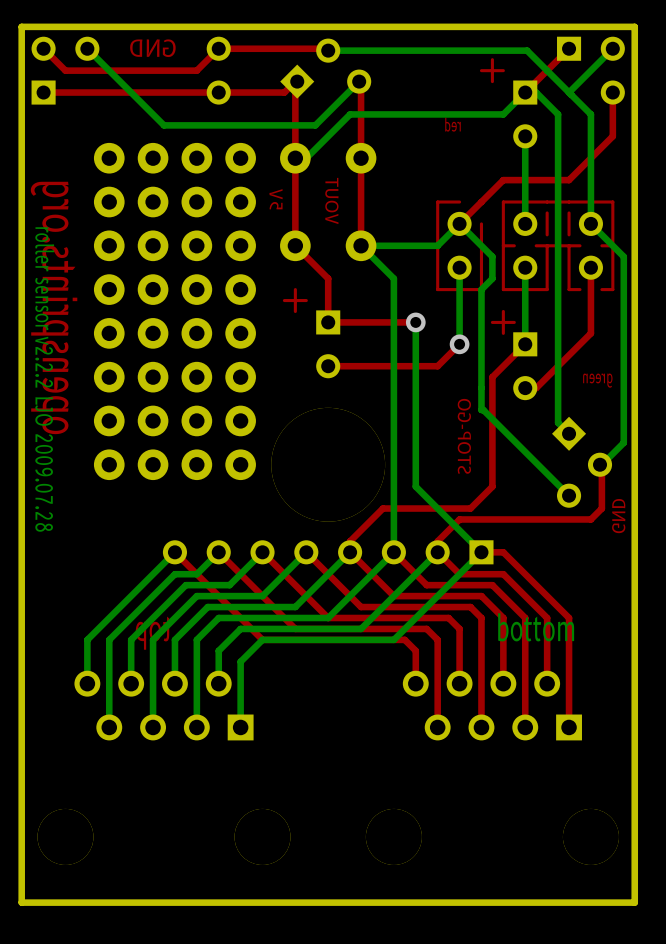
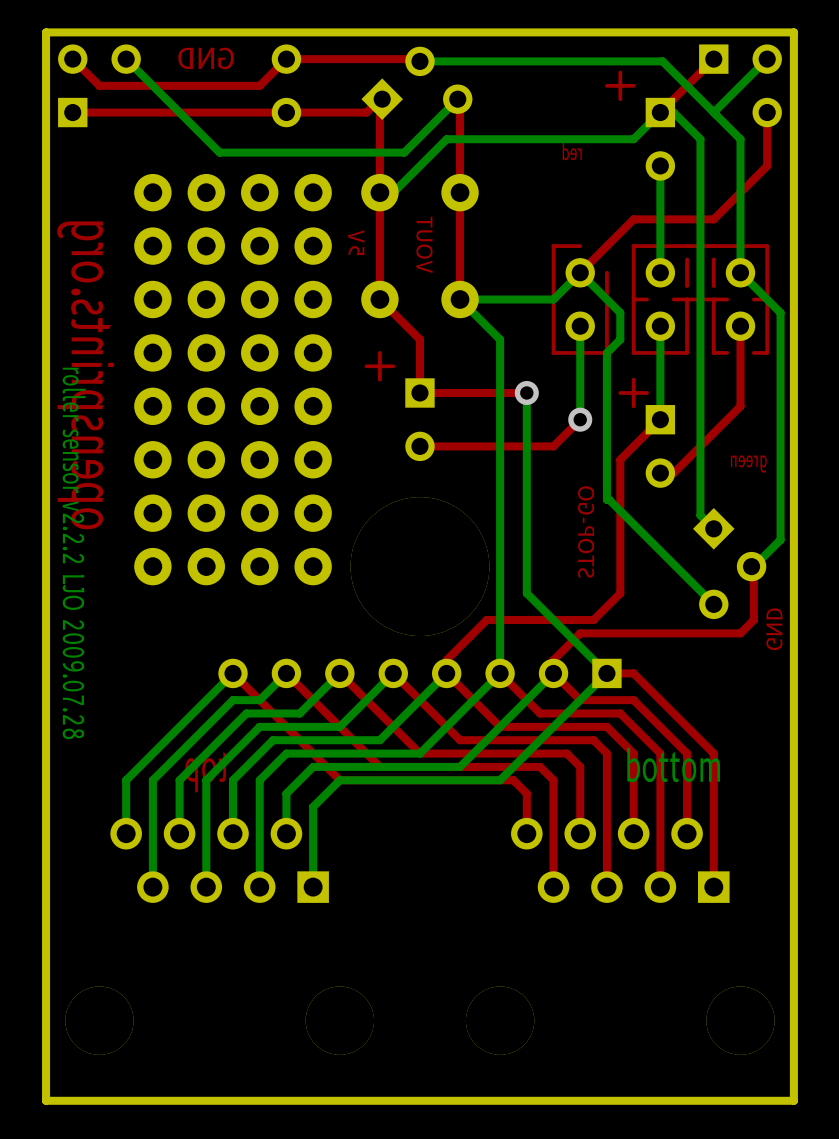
text position: roller sensor v2.2.2 LJO 2009.07.28 (44, 379) -> roller sensor v2.2.2 LJO 2009.07.28 (74, 553)

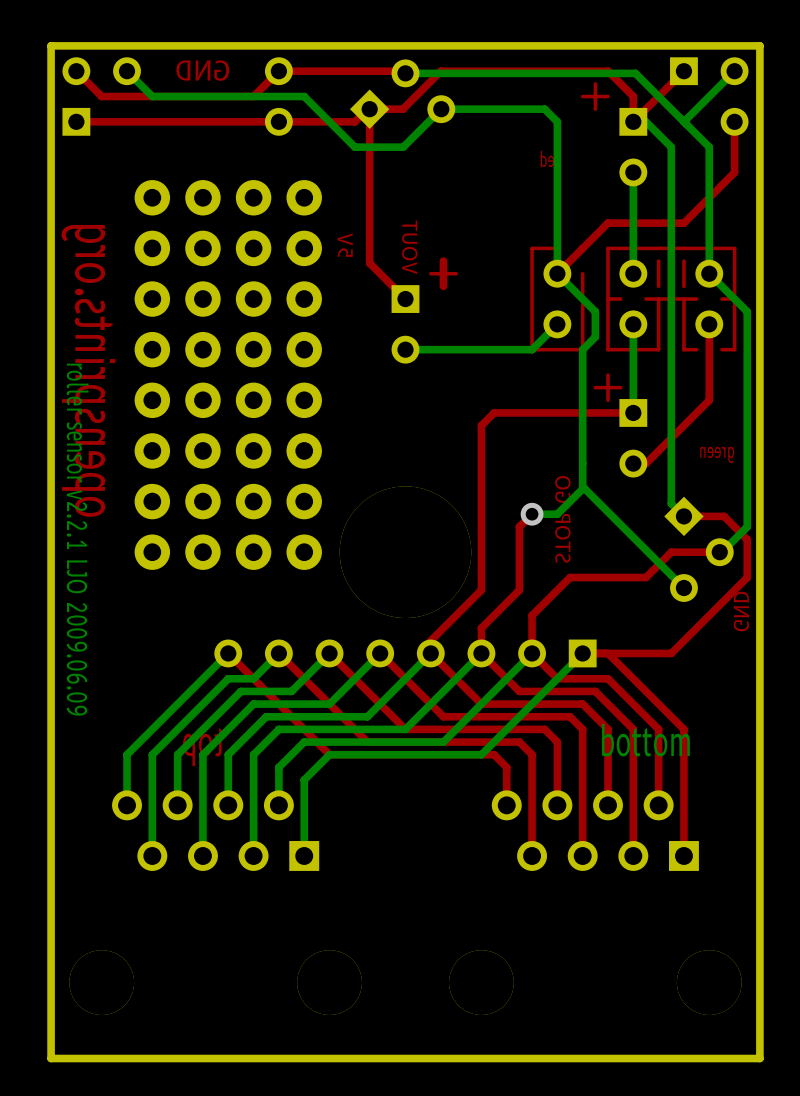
bottom track: (152, 85) (219, 152) (404, 152) (417, 139) -> (152, 96) (304, 96) (354, 147) (403, 147)
top track: (382, 99) (379, 101) (379, 299) (419, 339) (419, 392) (526, 392) -> (369, 109) (402, 109) (440, 71) (608, 71) (633, 96) (633, 121)
top track: (457, 99) (460, 101) (460, 259) -> none
top track: none -> (369, 111) (369, 263) (405, 299)
bottom track: (660, 112) (633, 139) (446, 139) (393, 192) (379, 192) -> none
part: (379, 192) -> none
part: (460, 192) -> none
bottom track: (580, 272) (553, 299) (460, 299) (500, 339) (500, 673) -> (557, 273) (557, 121) (544, 109) (441, 109)
part: (379, 299) -> none
part: (460, 299) -> none
bottom track: (580, 326) (580, 419) -> (557, 324) (532, 349) (405, 349)
top track: (379, 352) (379, 379) -> none
top track: (393, 366) (366, 366) -> (456, 273) (430, 273)
bottom track: (526, 392) (526, 593) (606, 673) -> none
via: (526, 392) -> none
part position: (419, 419) -> (405, 324)
top track: (580, 419) (553, 446) (419, 446) -> none
via: (580, 419) -> none
top track: (660, 419) (620, 459) (620, 593) (593, 620) (486, 620) -> (633, 412) (494, 412) (481, 425) (481, 590) (468, 602)
bottom track: none -> (582, 488) (557, 514) (532, 514)
top track: none -> (532, 514) (519, 526) (519, 590) (481, 628) (481, 653)
via: none -> (532, 514)
text: roller sensor v2.2.2 LJO 2009.07.28 (74, 553) -> roller sensor v2.2.1 LJO 2009.06.09 (77, 539)
top track: (751, 566) (753, 568) (753, 620) -> (683, 516) (724, 516) (747, 539) (747, 577) (721, 602)
top track: (740, 633) (580, 633) (553, 660) -> (719, 552) (671, 552) (645, 577) (570, 577) (532, 615) (532, 640)
top track: none -> (709, 615) (671, 653) (608, 653)

